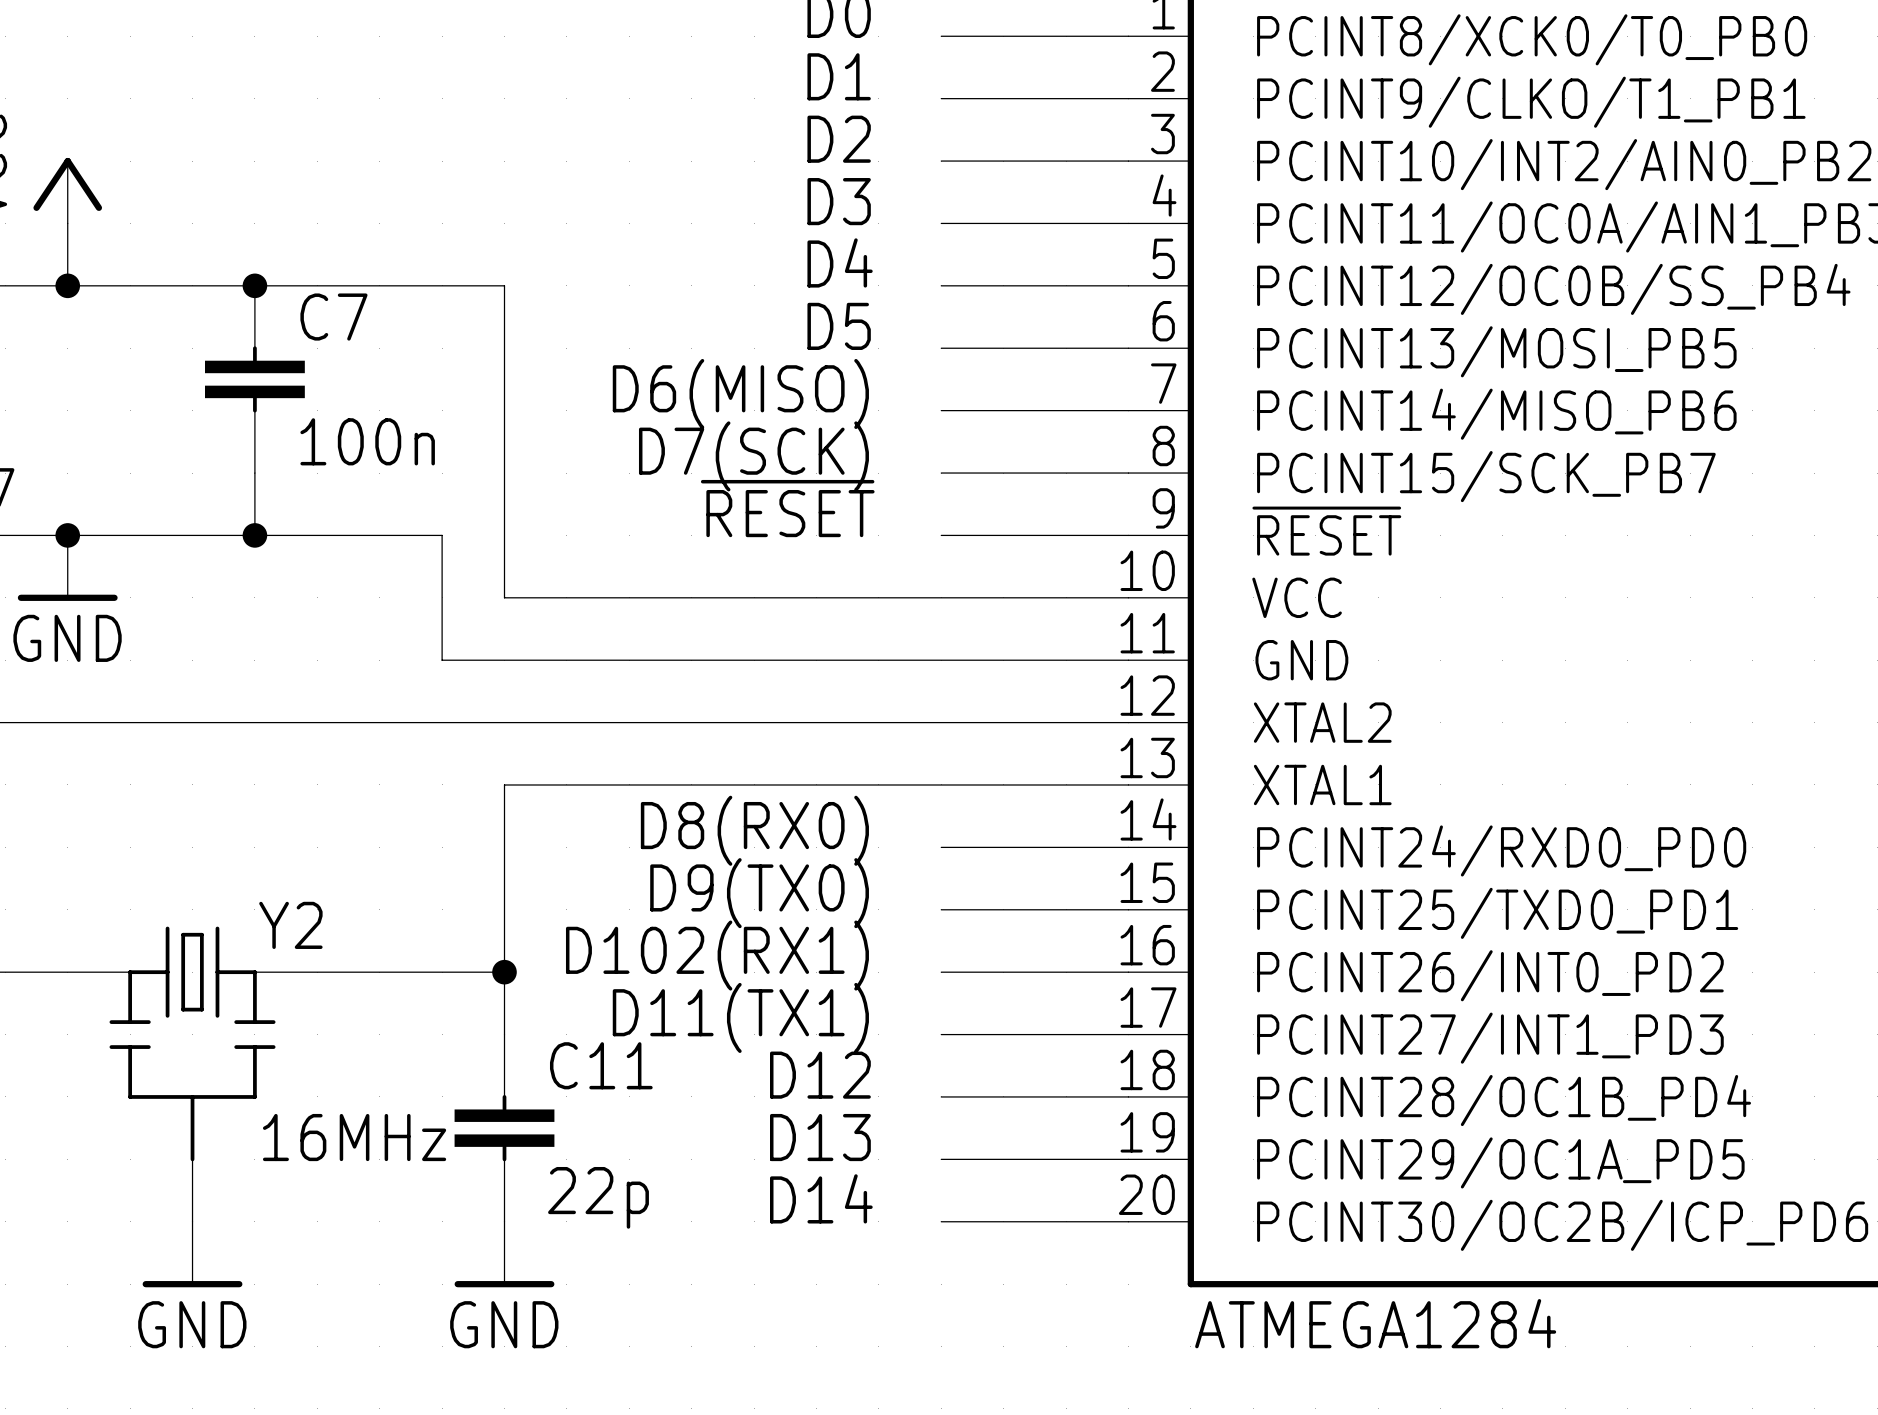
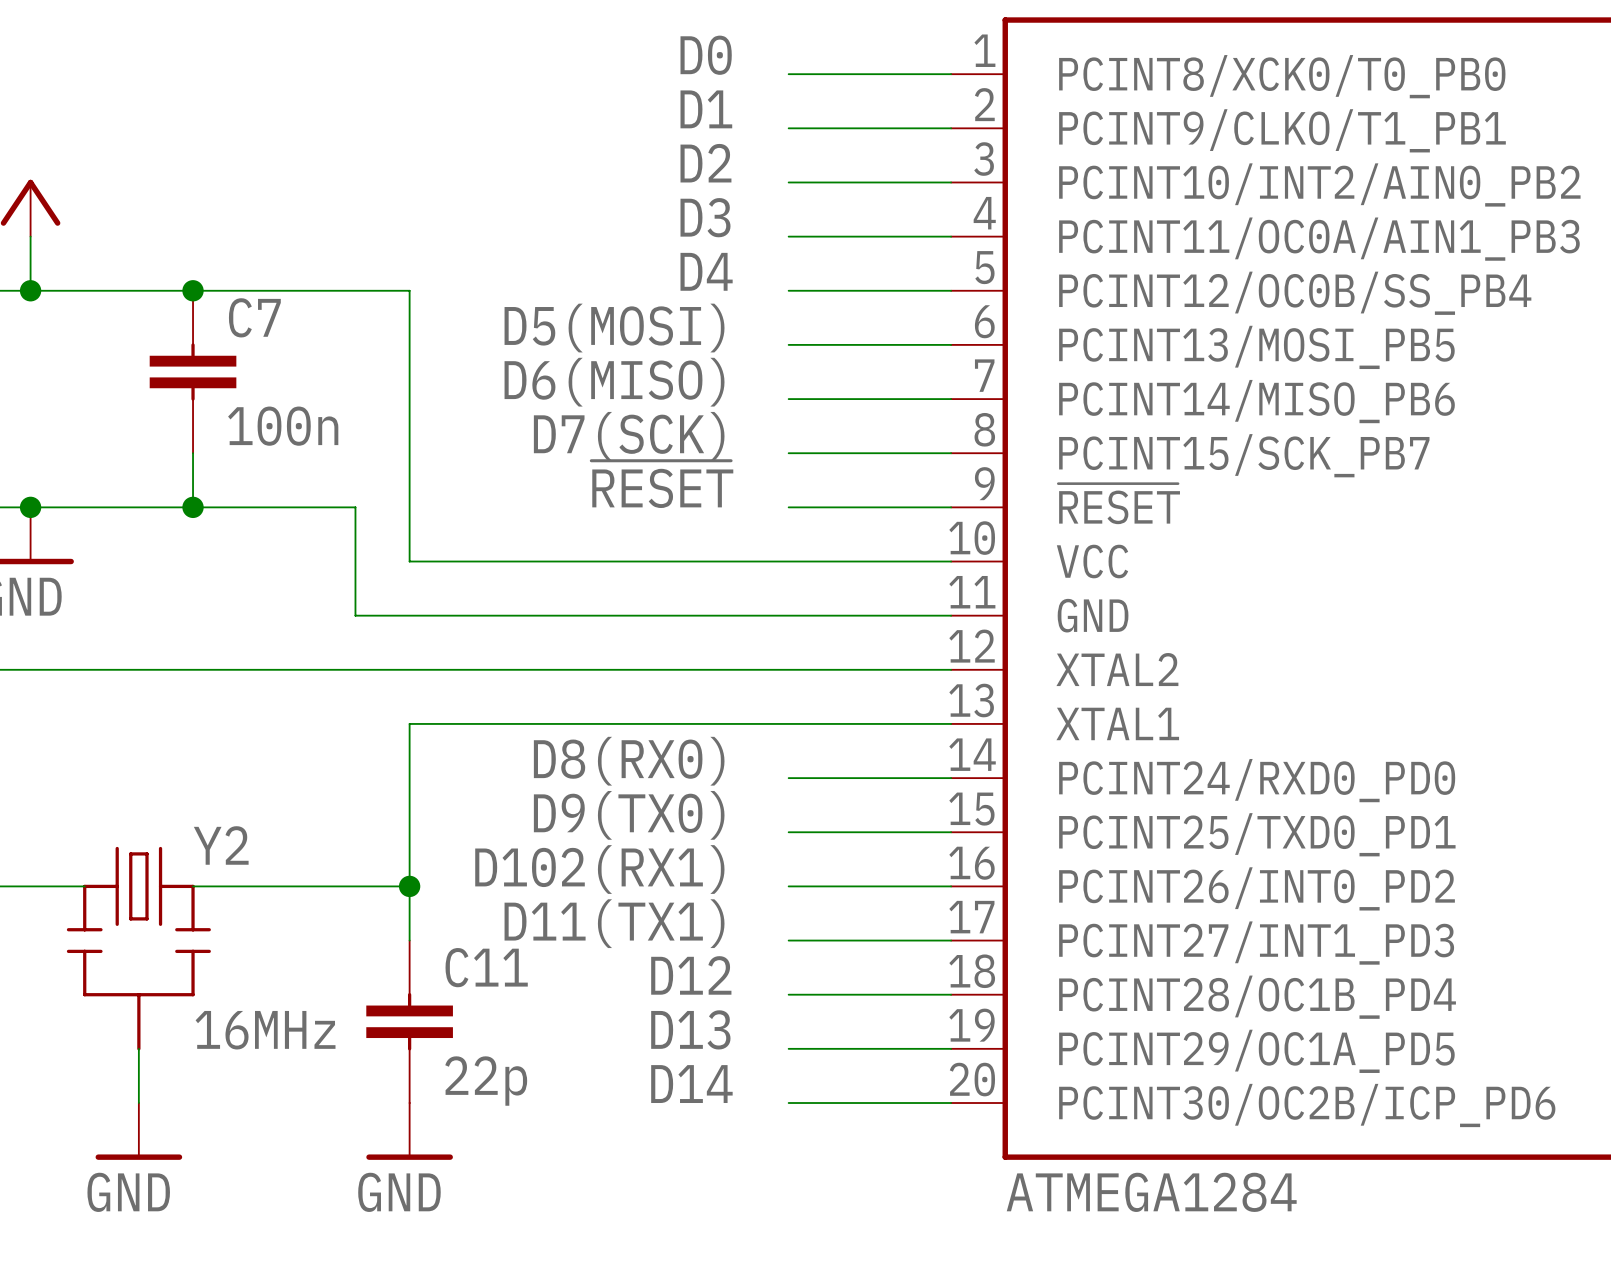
label: D5 (839, 326) -> D5(MOSI) (614, 328)

